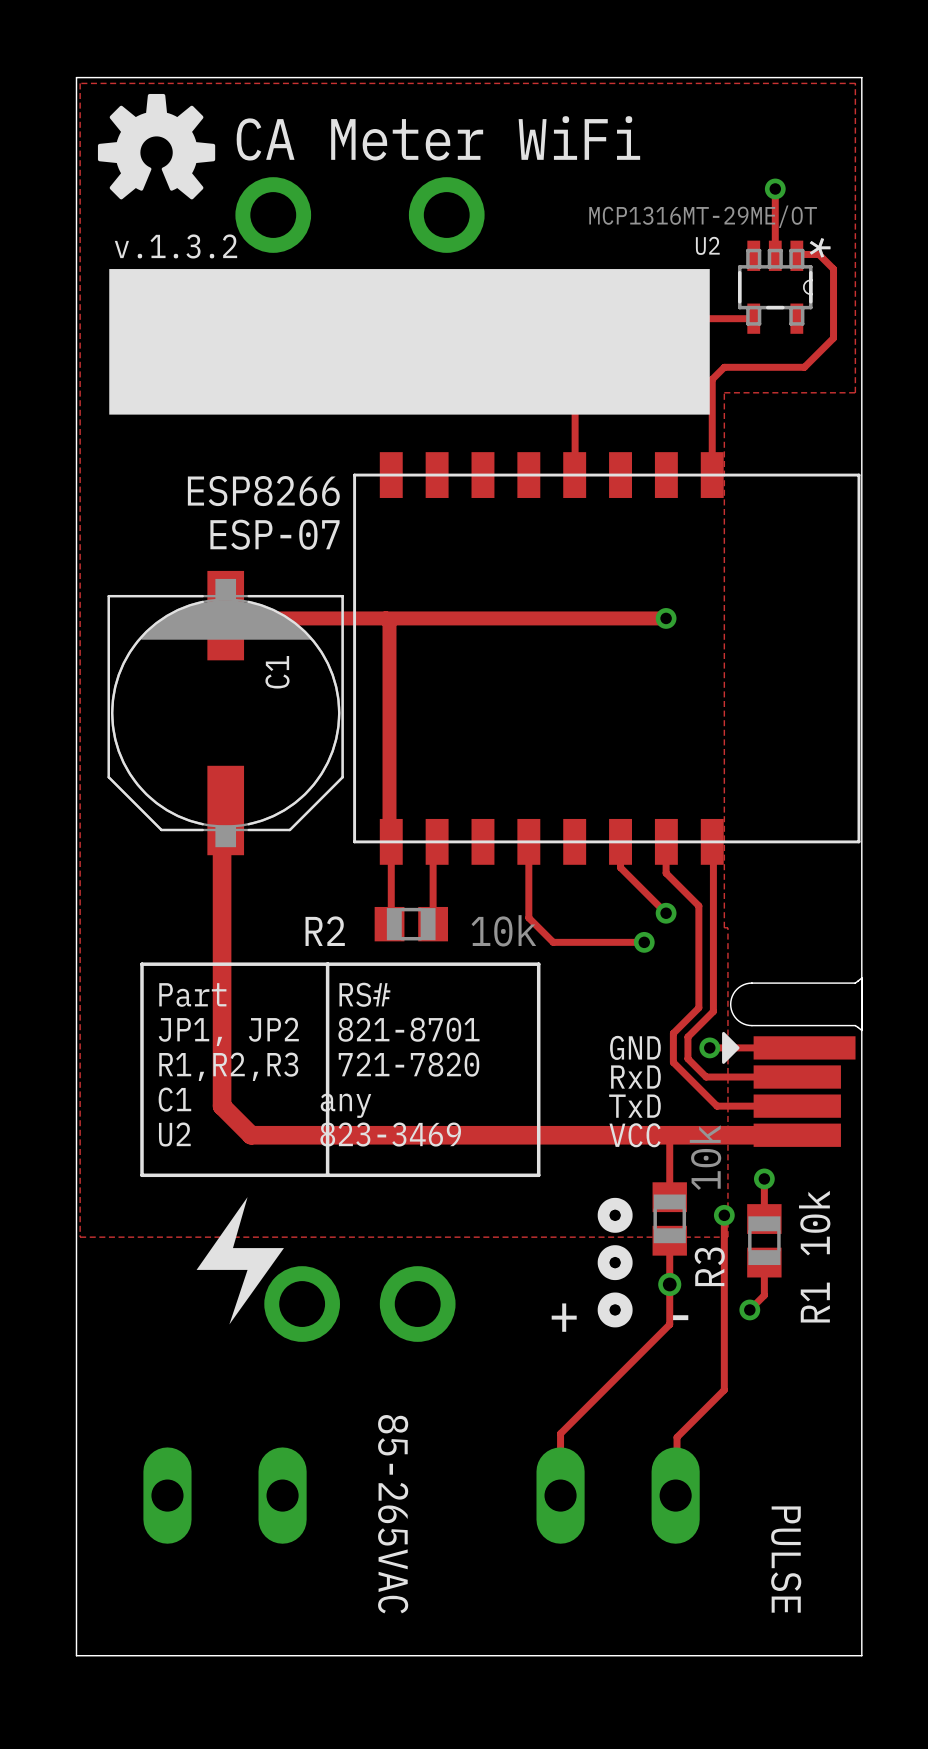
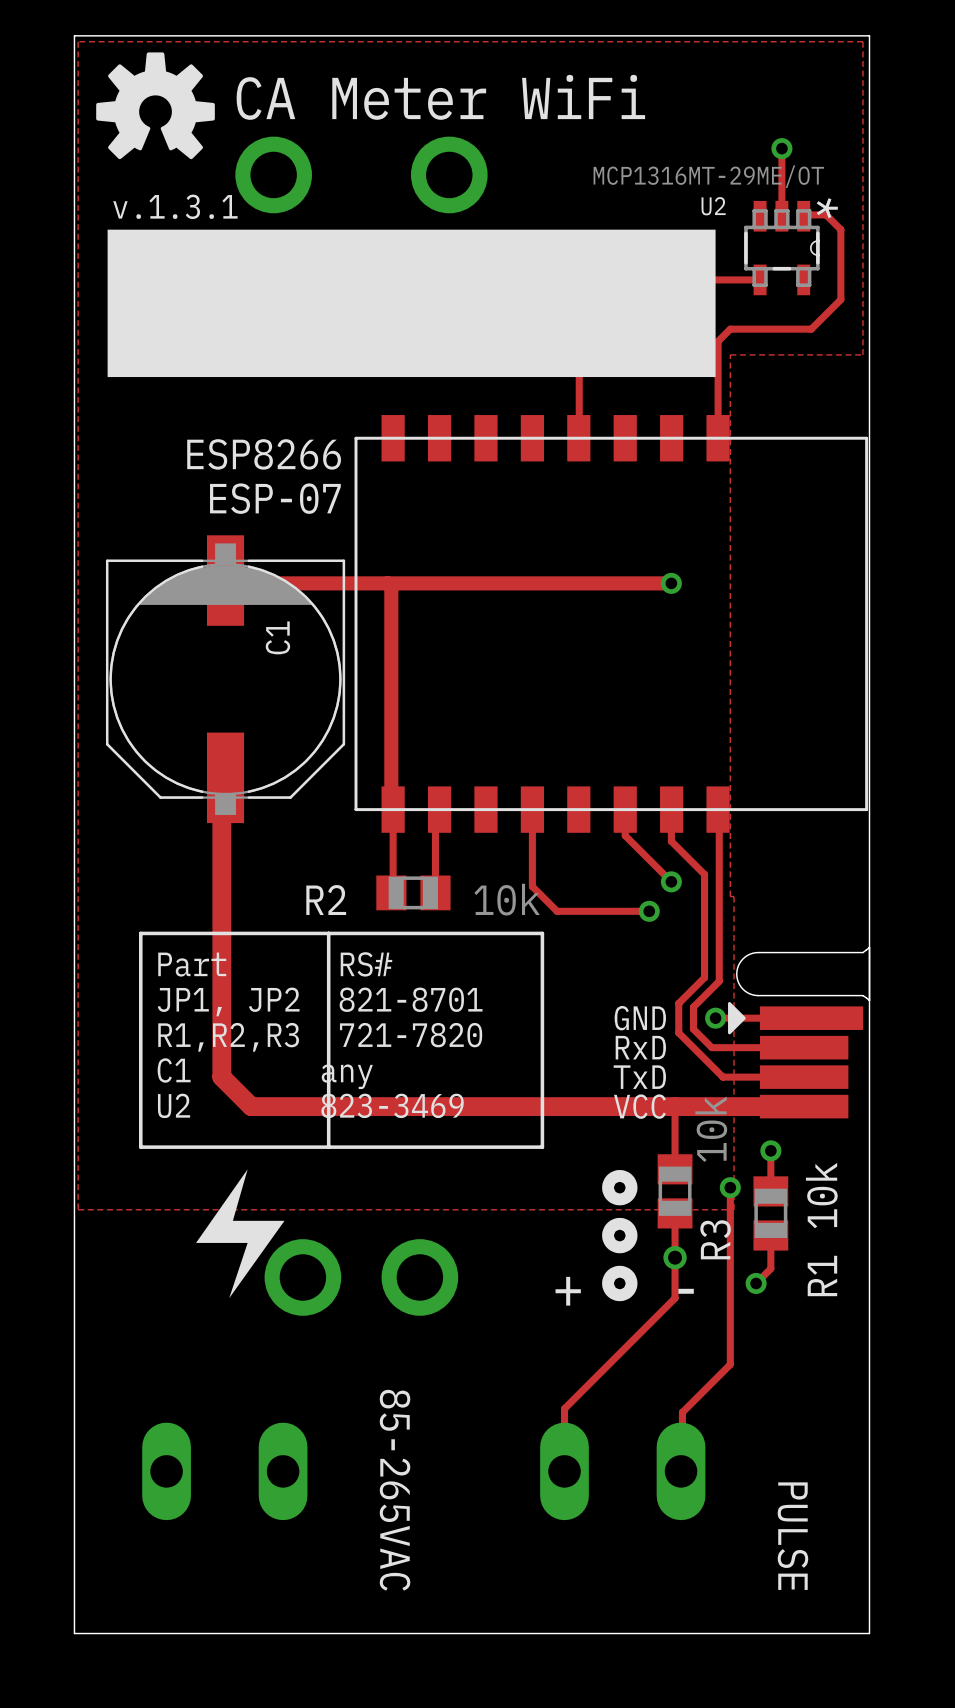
text: v.1.3.2 (175, 246) -> v.1.3.1 (175, 206)

